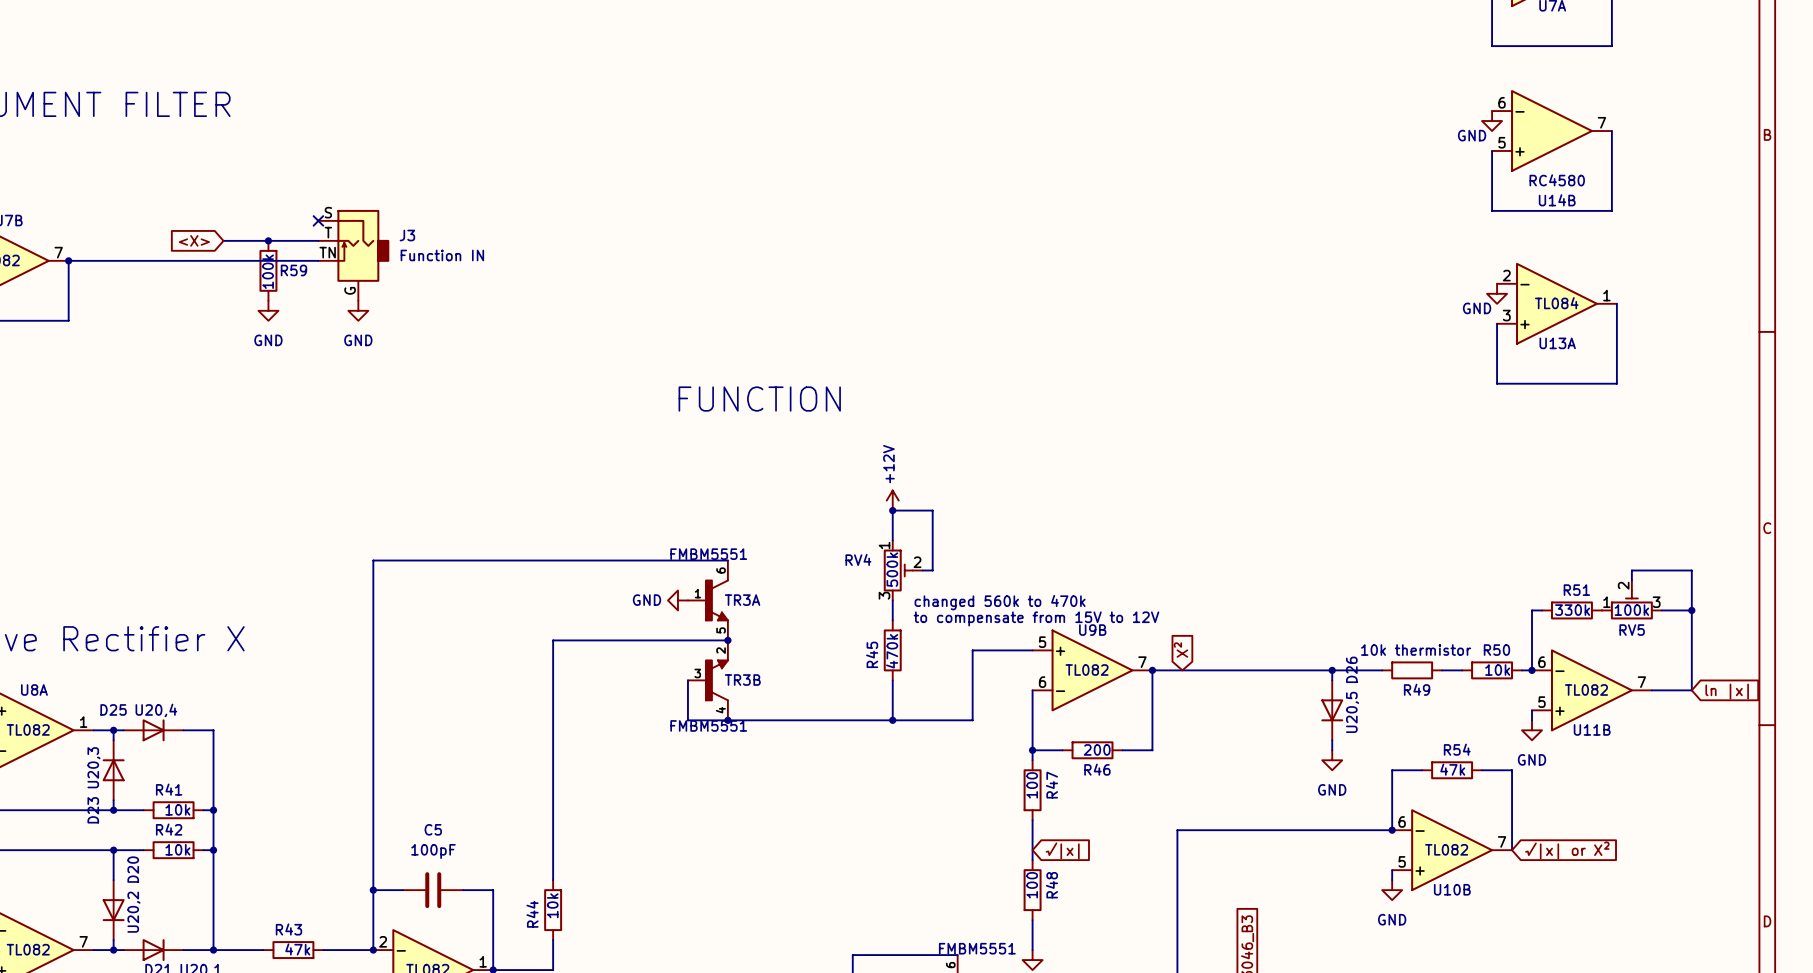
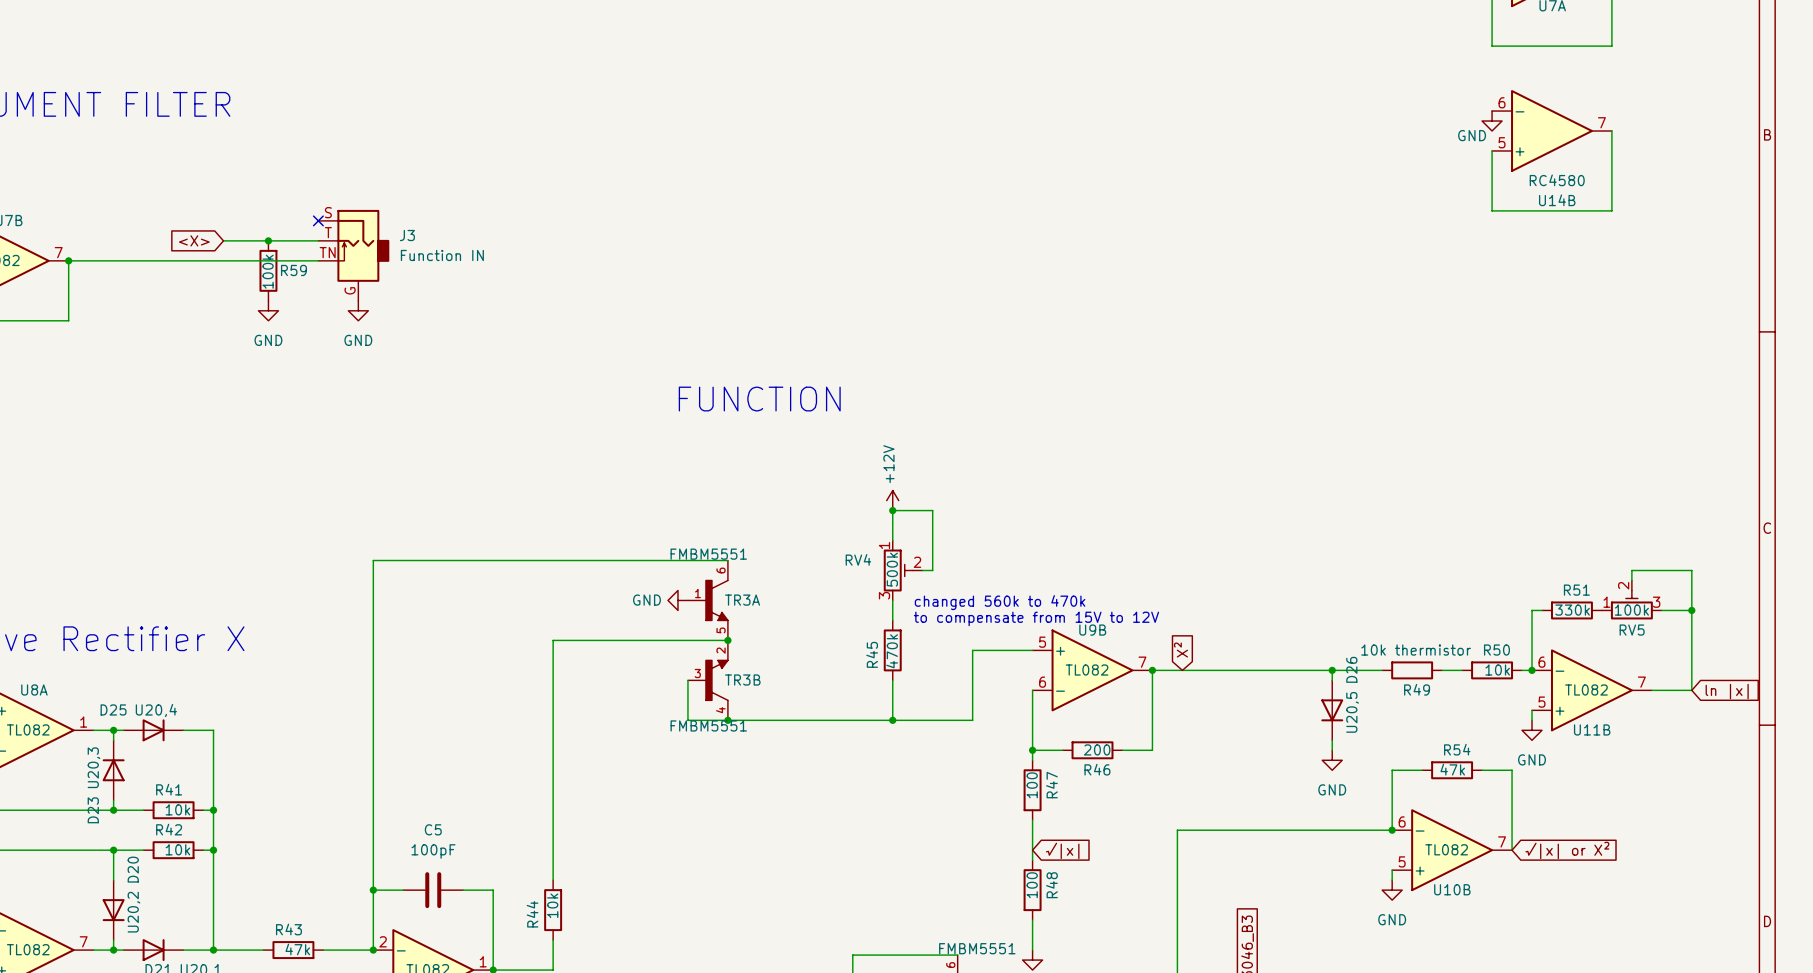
power symbol: GND (1497, 293) -> none
U13A: TL084 (1556, 303) -> none
wire: (1616, 303) (1616, 383) (1497, 383) (1497, 323) -> none

